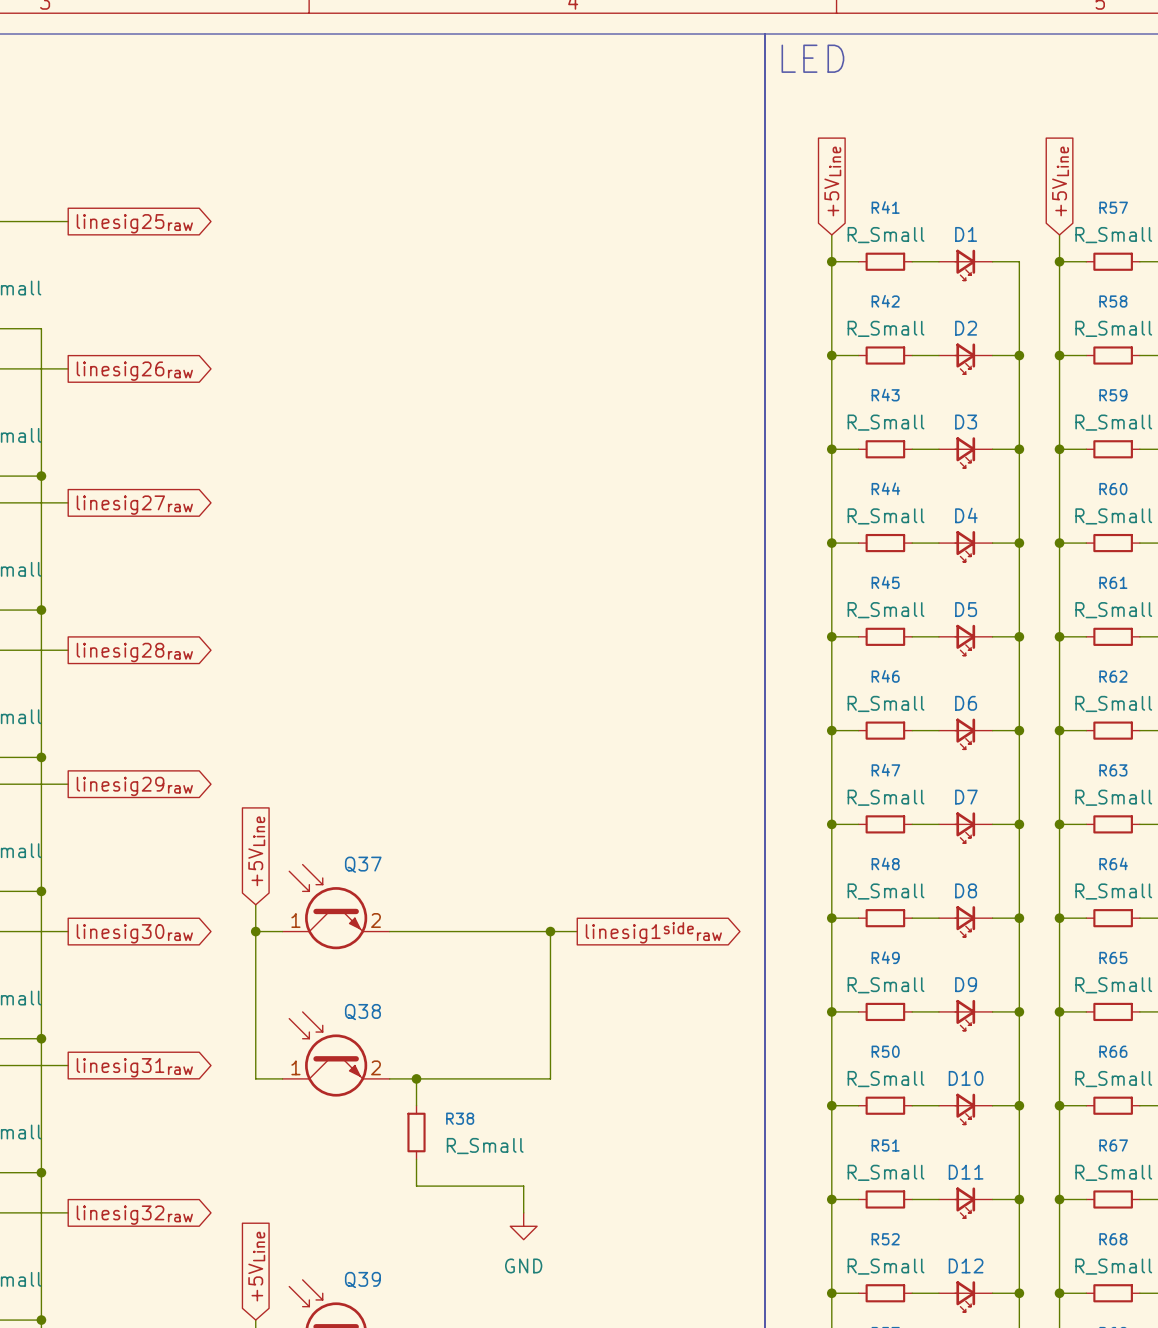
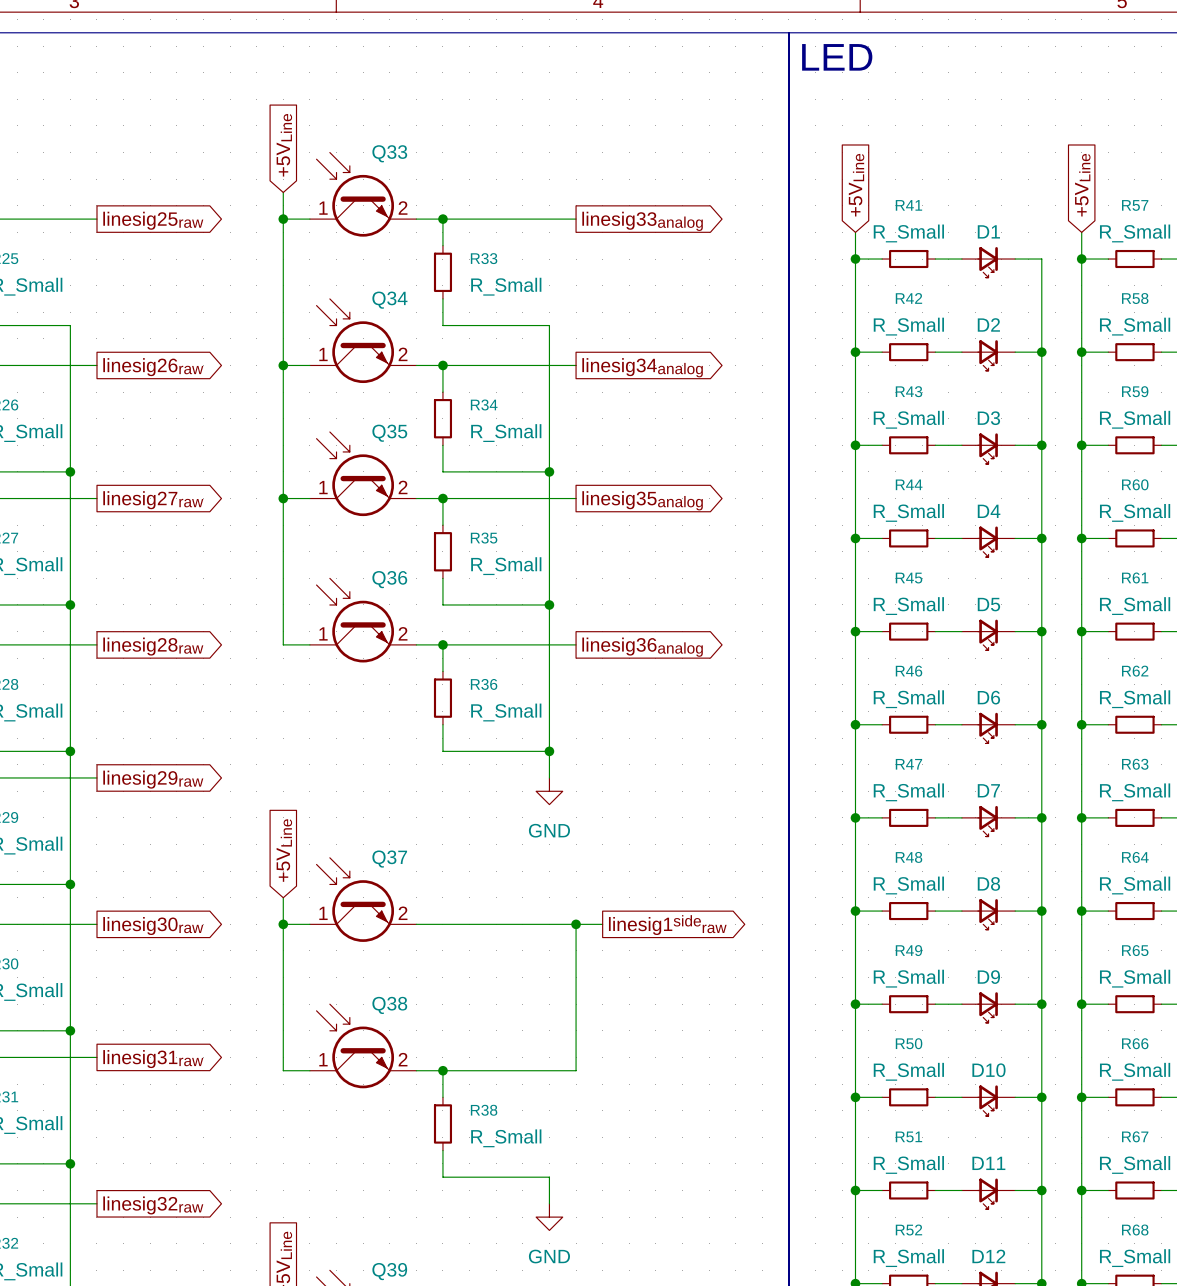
global label: none -> +5VLine (284, 145)
wire: none -> (283, 192) (283, 644) (309, 644)
Q33: none -> (363, 194)
wire: none -> (283, 219) (309, 219)
junction: none -> (283, 219)
wire: none -> (416, 219) (576, 219)
wire: none -> (442, 219) (442, 245)
junction: none -> (442, 219)
global label: none -> linesig33analog (642, 221)
R33: none -> R_Small (442, 272)
wire: none -> (442, 298) (442, 325) (549, 325) (549, 777)
Q34: none -> (363, 340)
wire: none -> (283, 365) (309, 365)
junction: none -> (283, 365)
wire: none -> (416, 365) (576, 365)
wire: none -> (442, 365) (442, 392)
junction: none -> (442, 365)
global label: none -> linesig34analog (642, 367)
R34: none -> R_Small (442, 418)
wire: none -> (442, 445) (442, 471) (549, 471)
junction: none -> (549, 471)
Q35: none -> (363, 474)
wire: none -> (283, 498) (309, 498)
junction: none -> (283, 498)
wire: none -> (416, 498) (576, 498)
wire: none -> (442, 498) (442, 525)
junction: none -> (442, 498)
global label: none -> linesig35analog (642, 500)
R35: none -> R_Small (442, 551)
wire: none -> (442, 578) (442, 604) (549, 604)
junction: none -> (549, 604)
Q36: none -> (363, 620)
wire: none -> (416, 644) (576, 644)
wire: none -> (442, 644) (442, 671)
junction: none -> (442, 644)
global label: none -> linesig36analog (642, 647)
R36: none -> R_Small (442, 698)
wire: none -> (442, 724) (442, 751) (549, 751)
junction: none -> (549, 751)
power symbol: none -> GND (549, 791)

